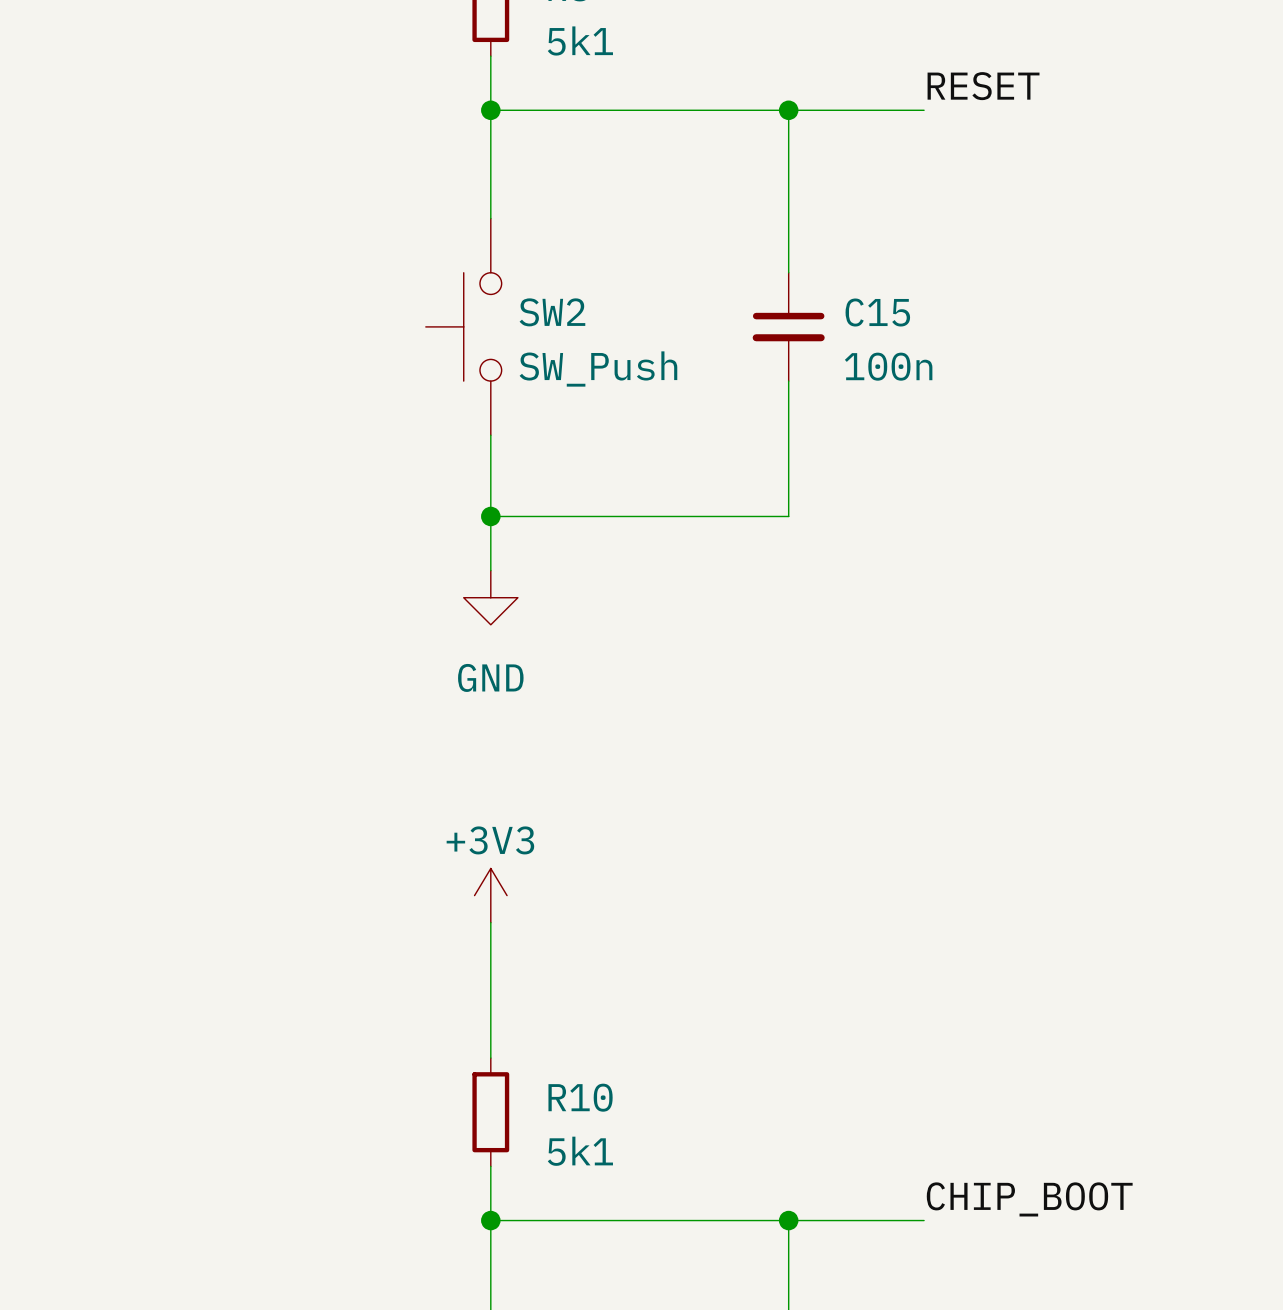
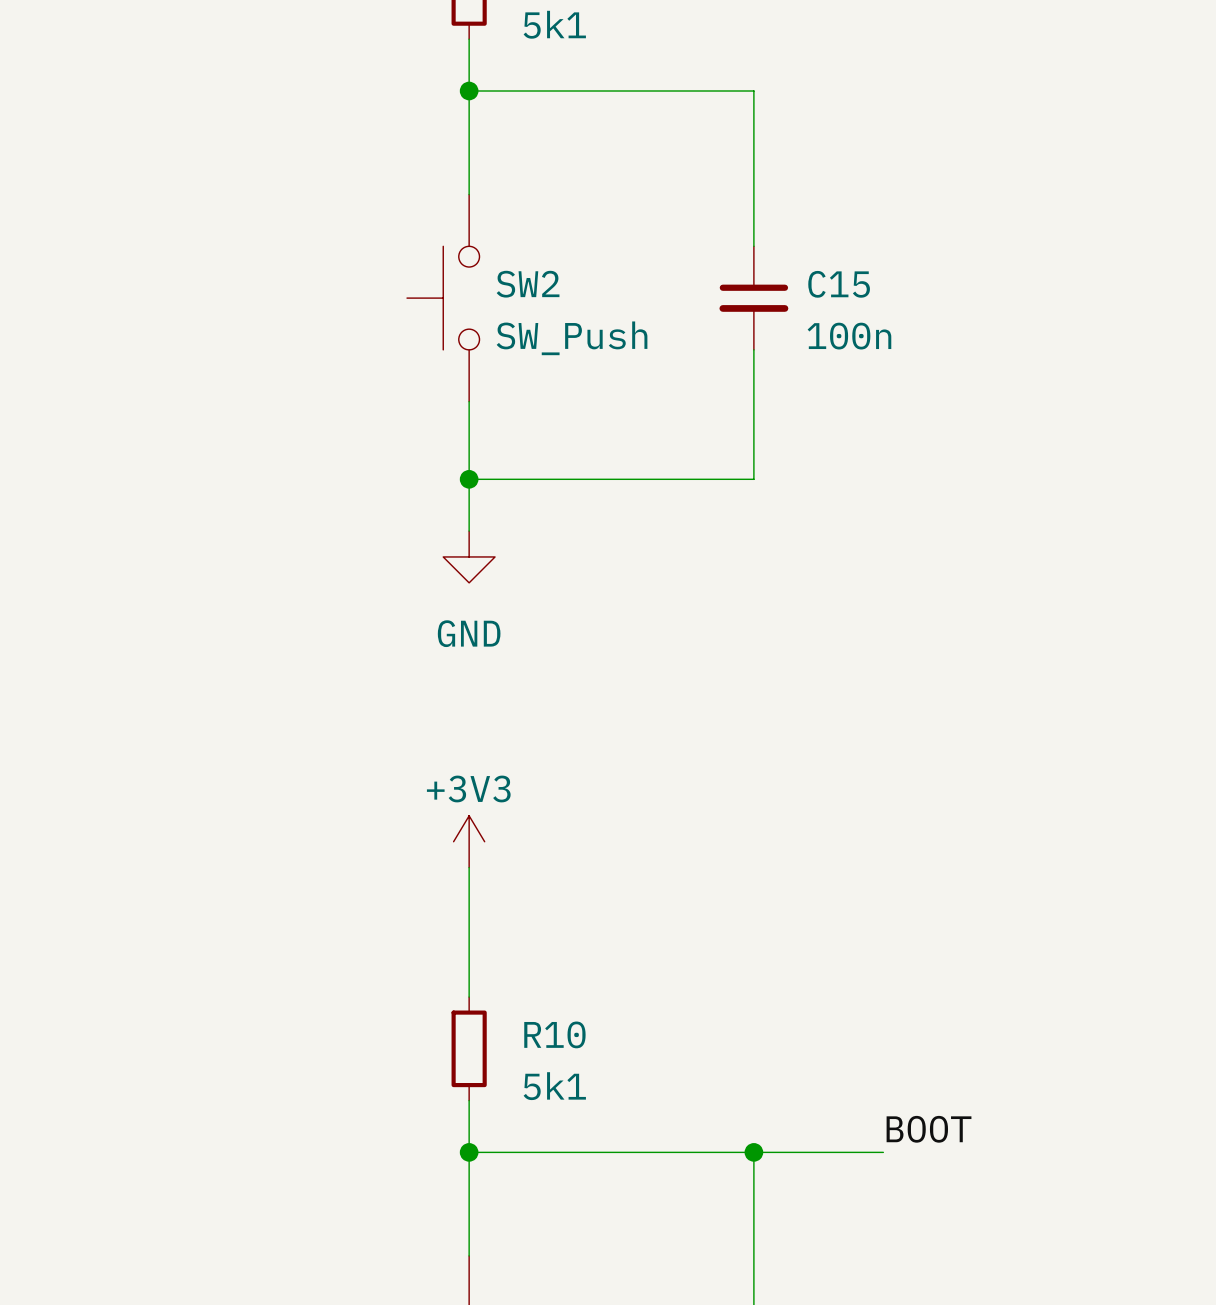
label: RESET (983, 86) -> none
wire: (788, 110) (924, 110) -> none
junction: (788, 110) -> none
label: CHIP_BOOT (1029, 1199) -> BOOT (929, 1129)

